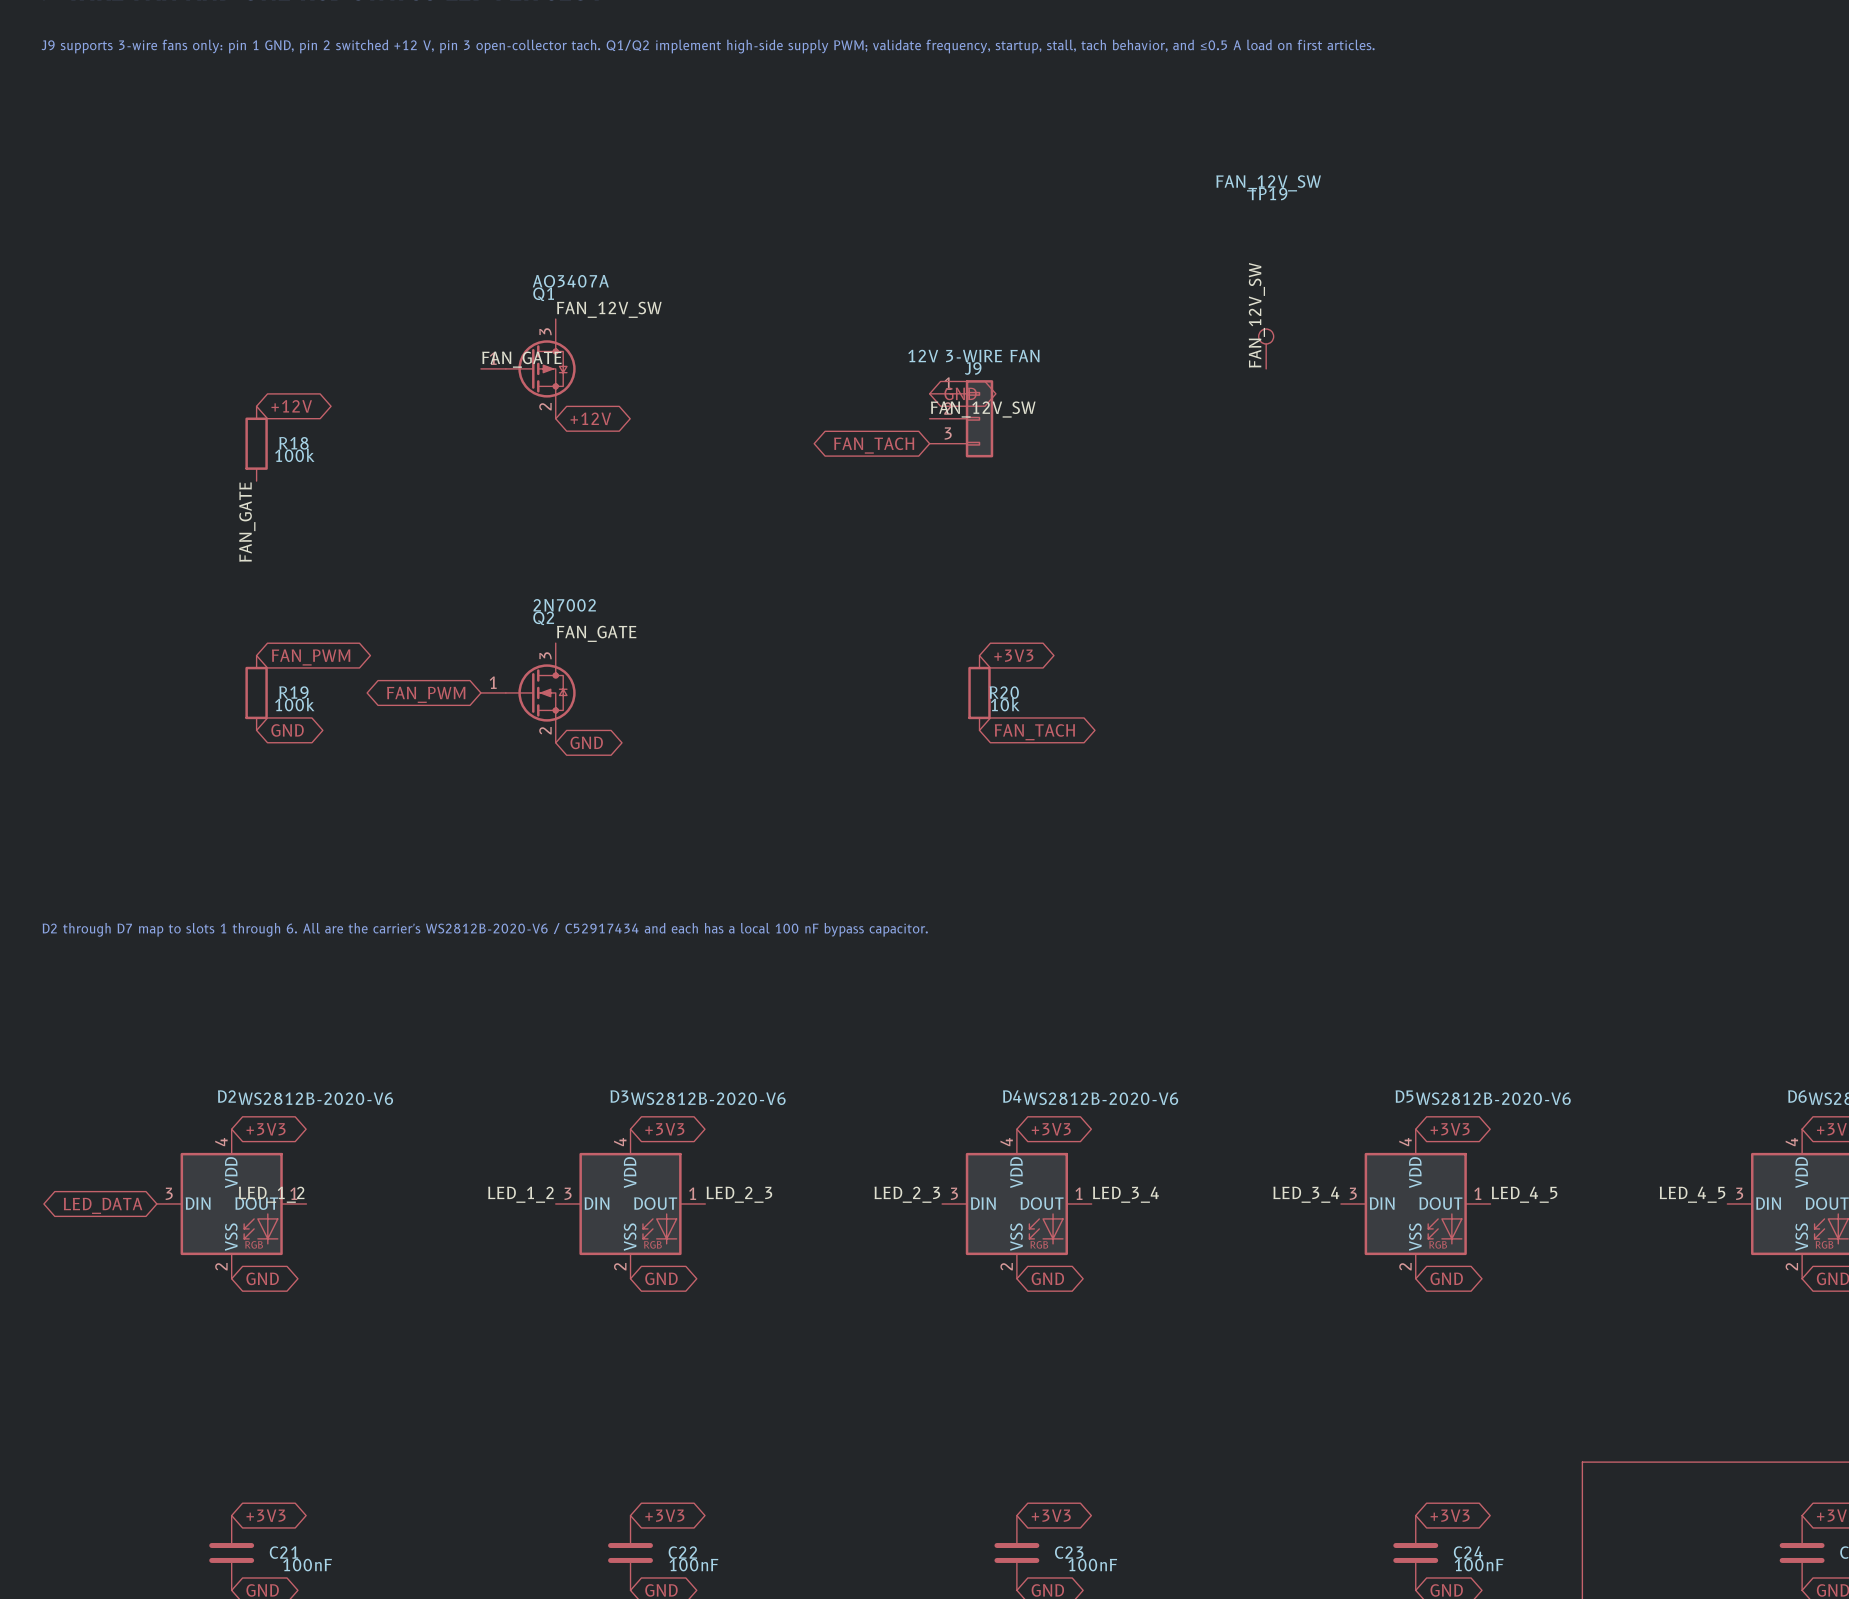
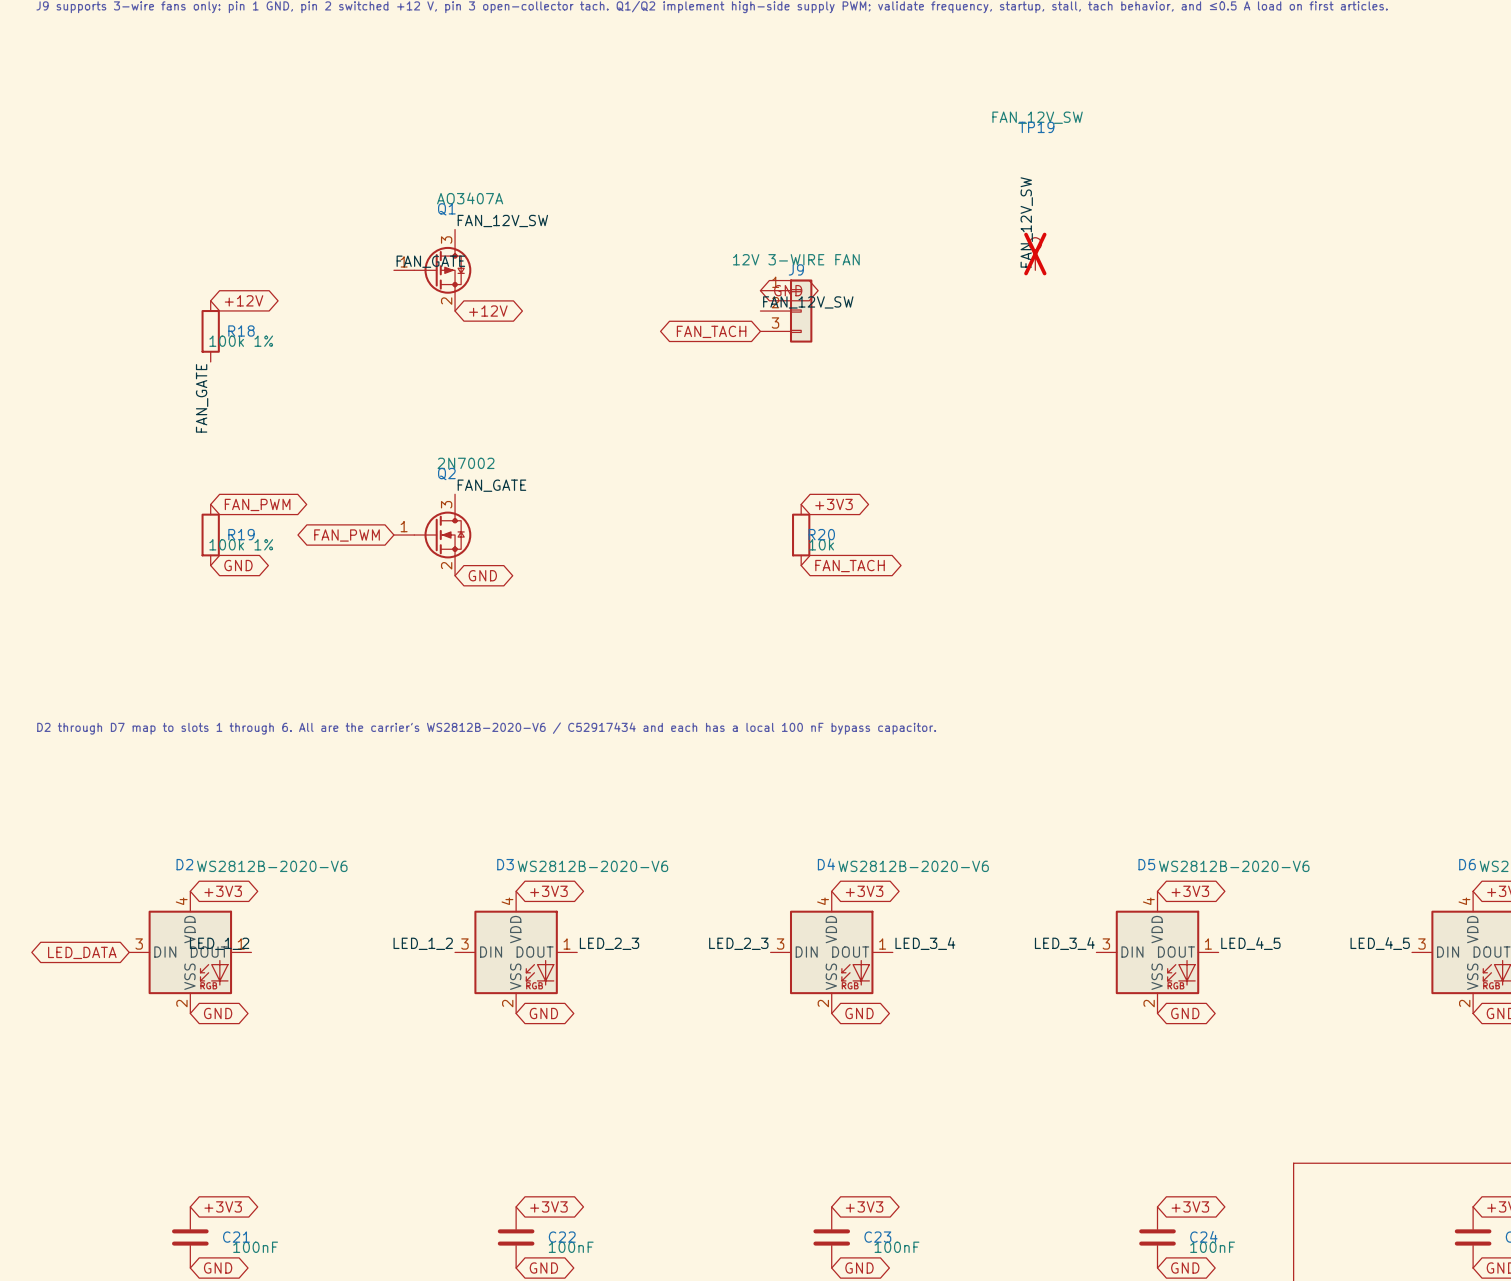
TP19 do-not-place cross: none -> (1035, 254)
R18 value: 100k (294, 455) -> 100k 1% (241, 341)
R19 value: 100k (294, 704) -> 100k 1% (241, 544)

